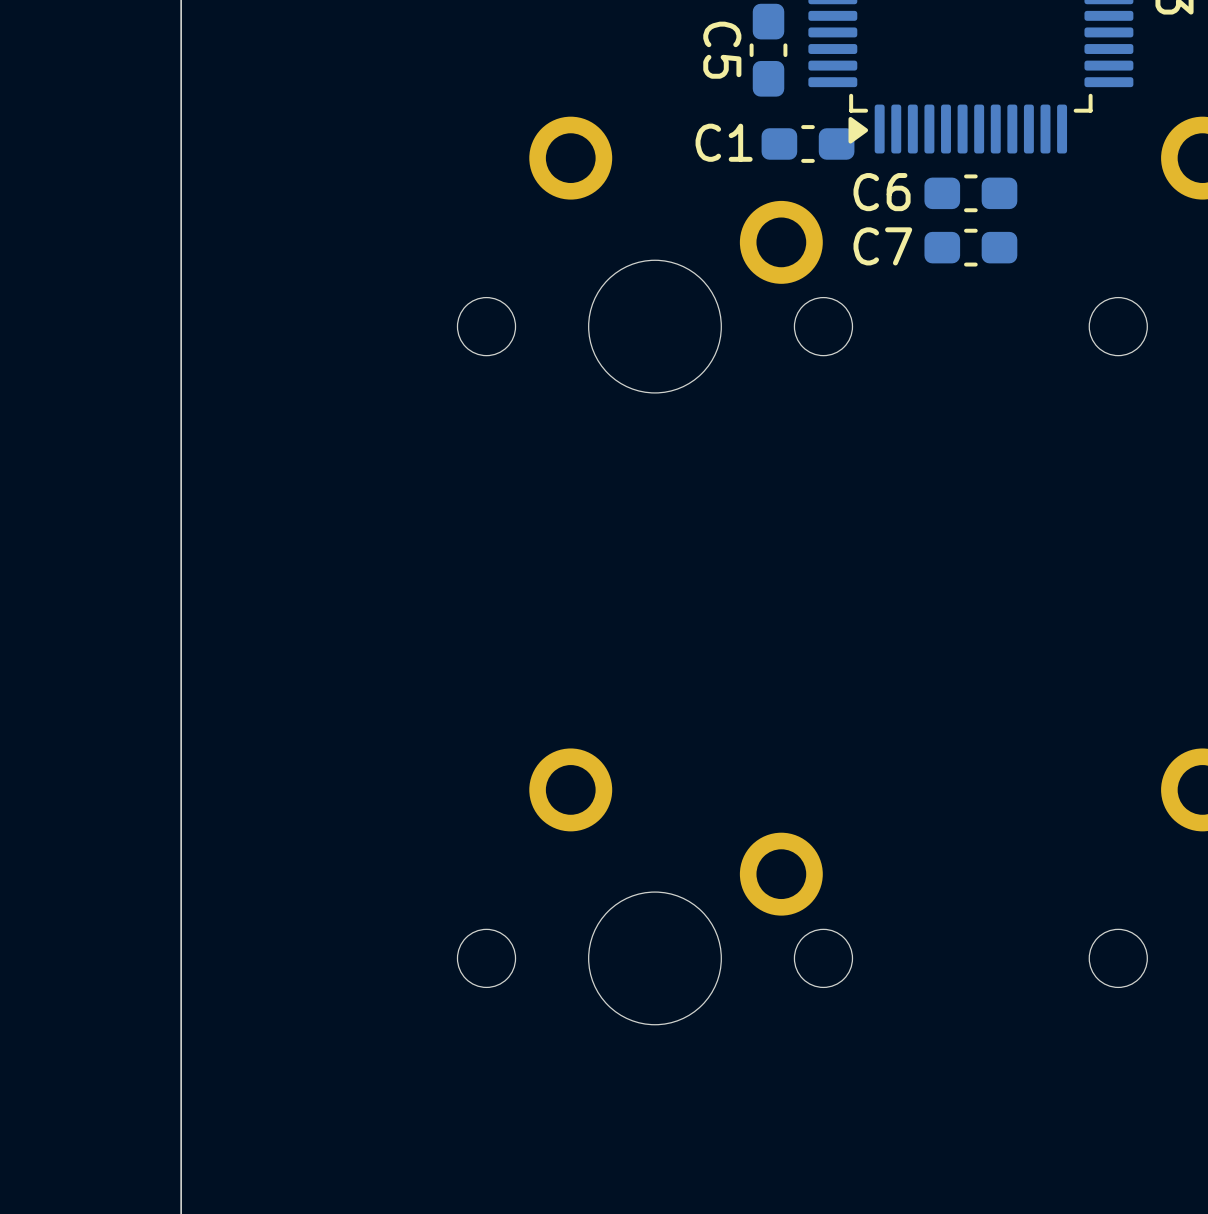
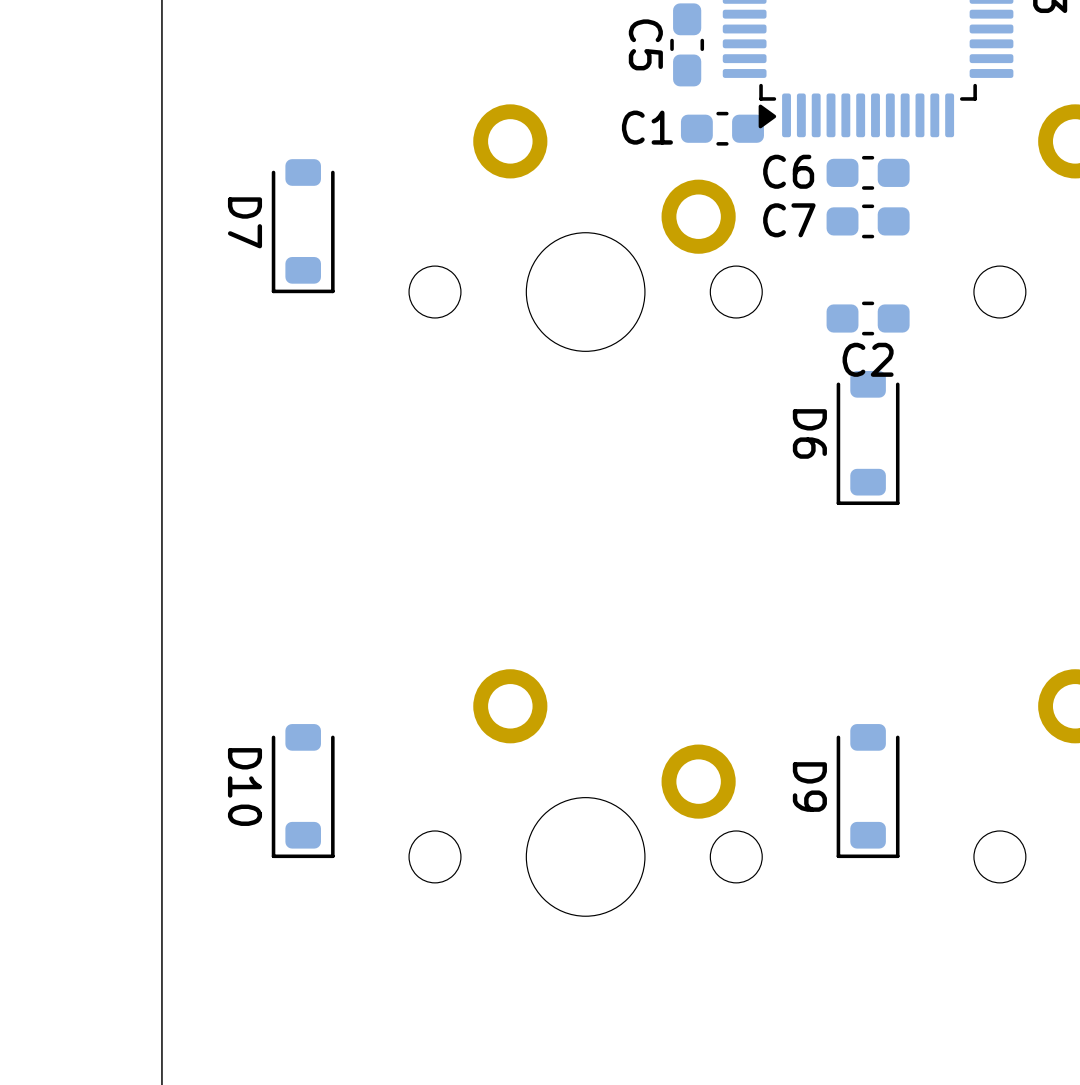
D7: none -> (303, 226)
C2: none -> (868, 318)
D6: none -> (868, 437)
D10: none -> (303, 791)
D9: none -> (868, 791)

